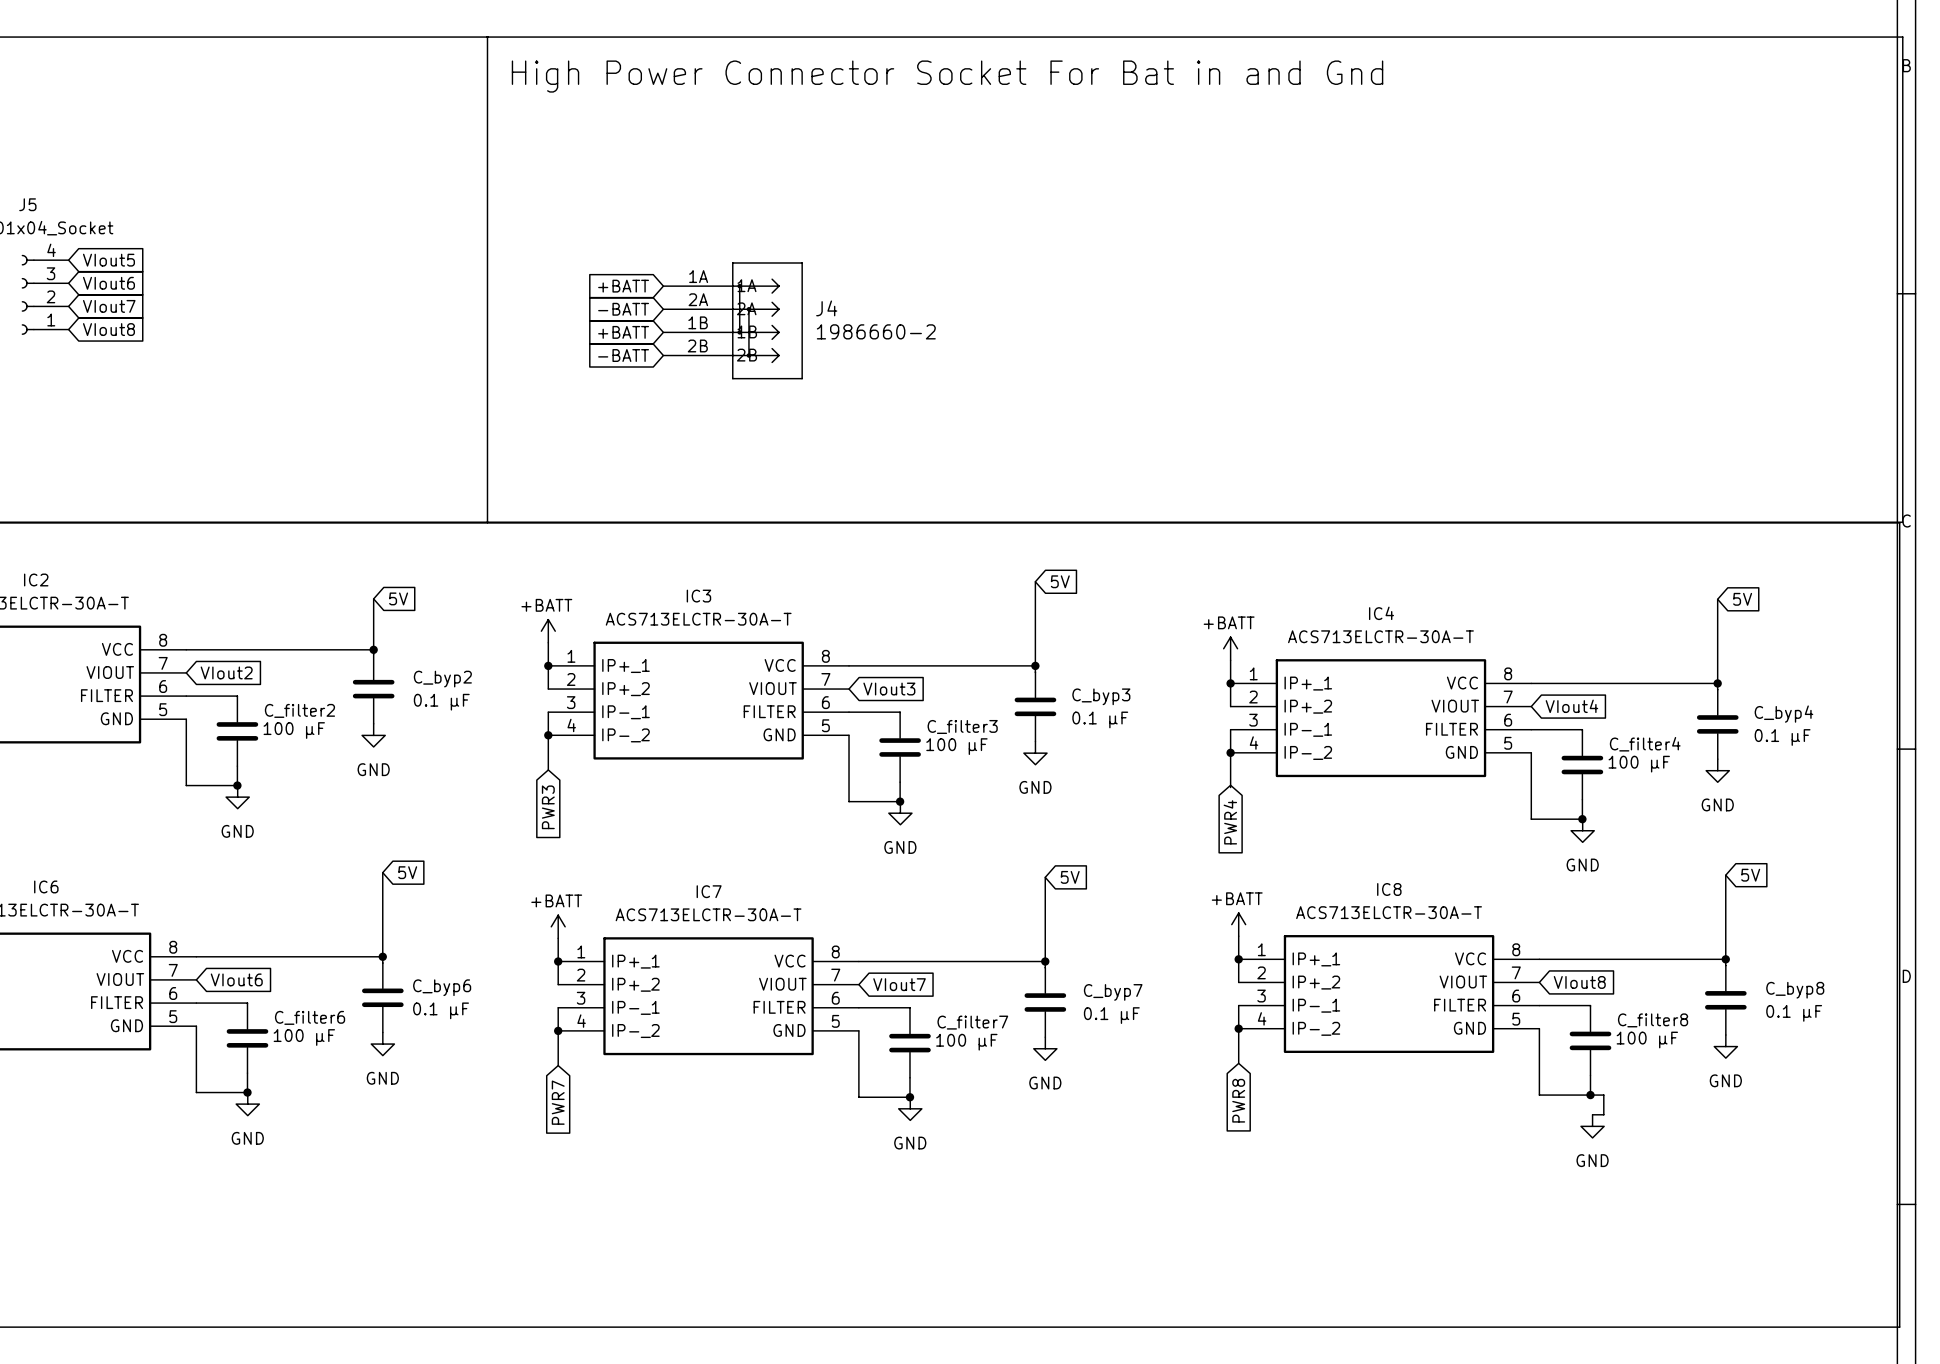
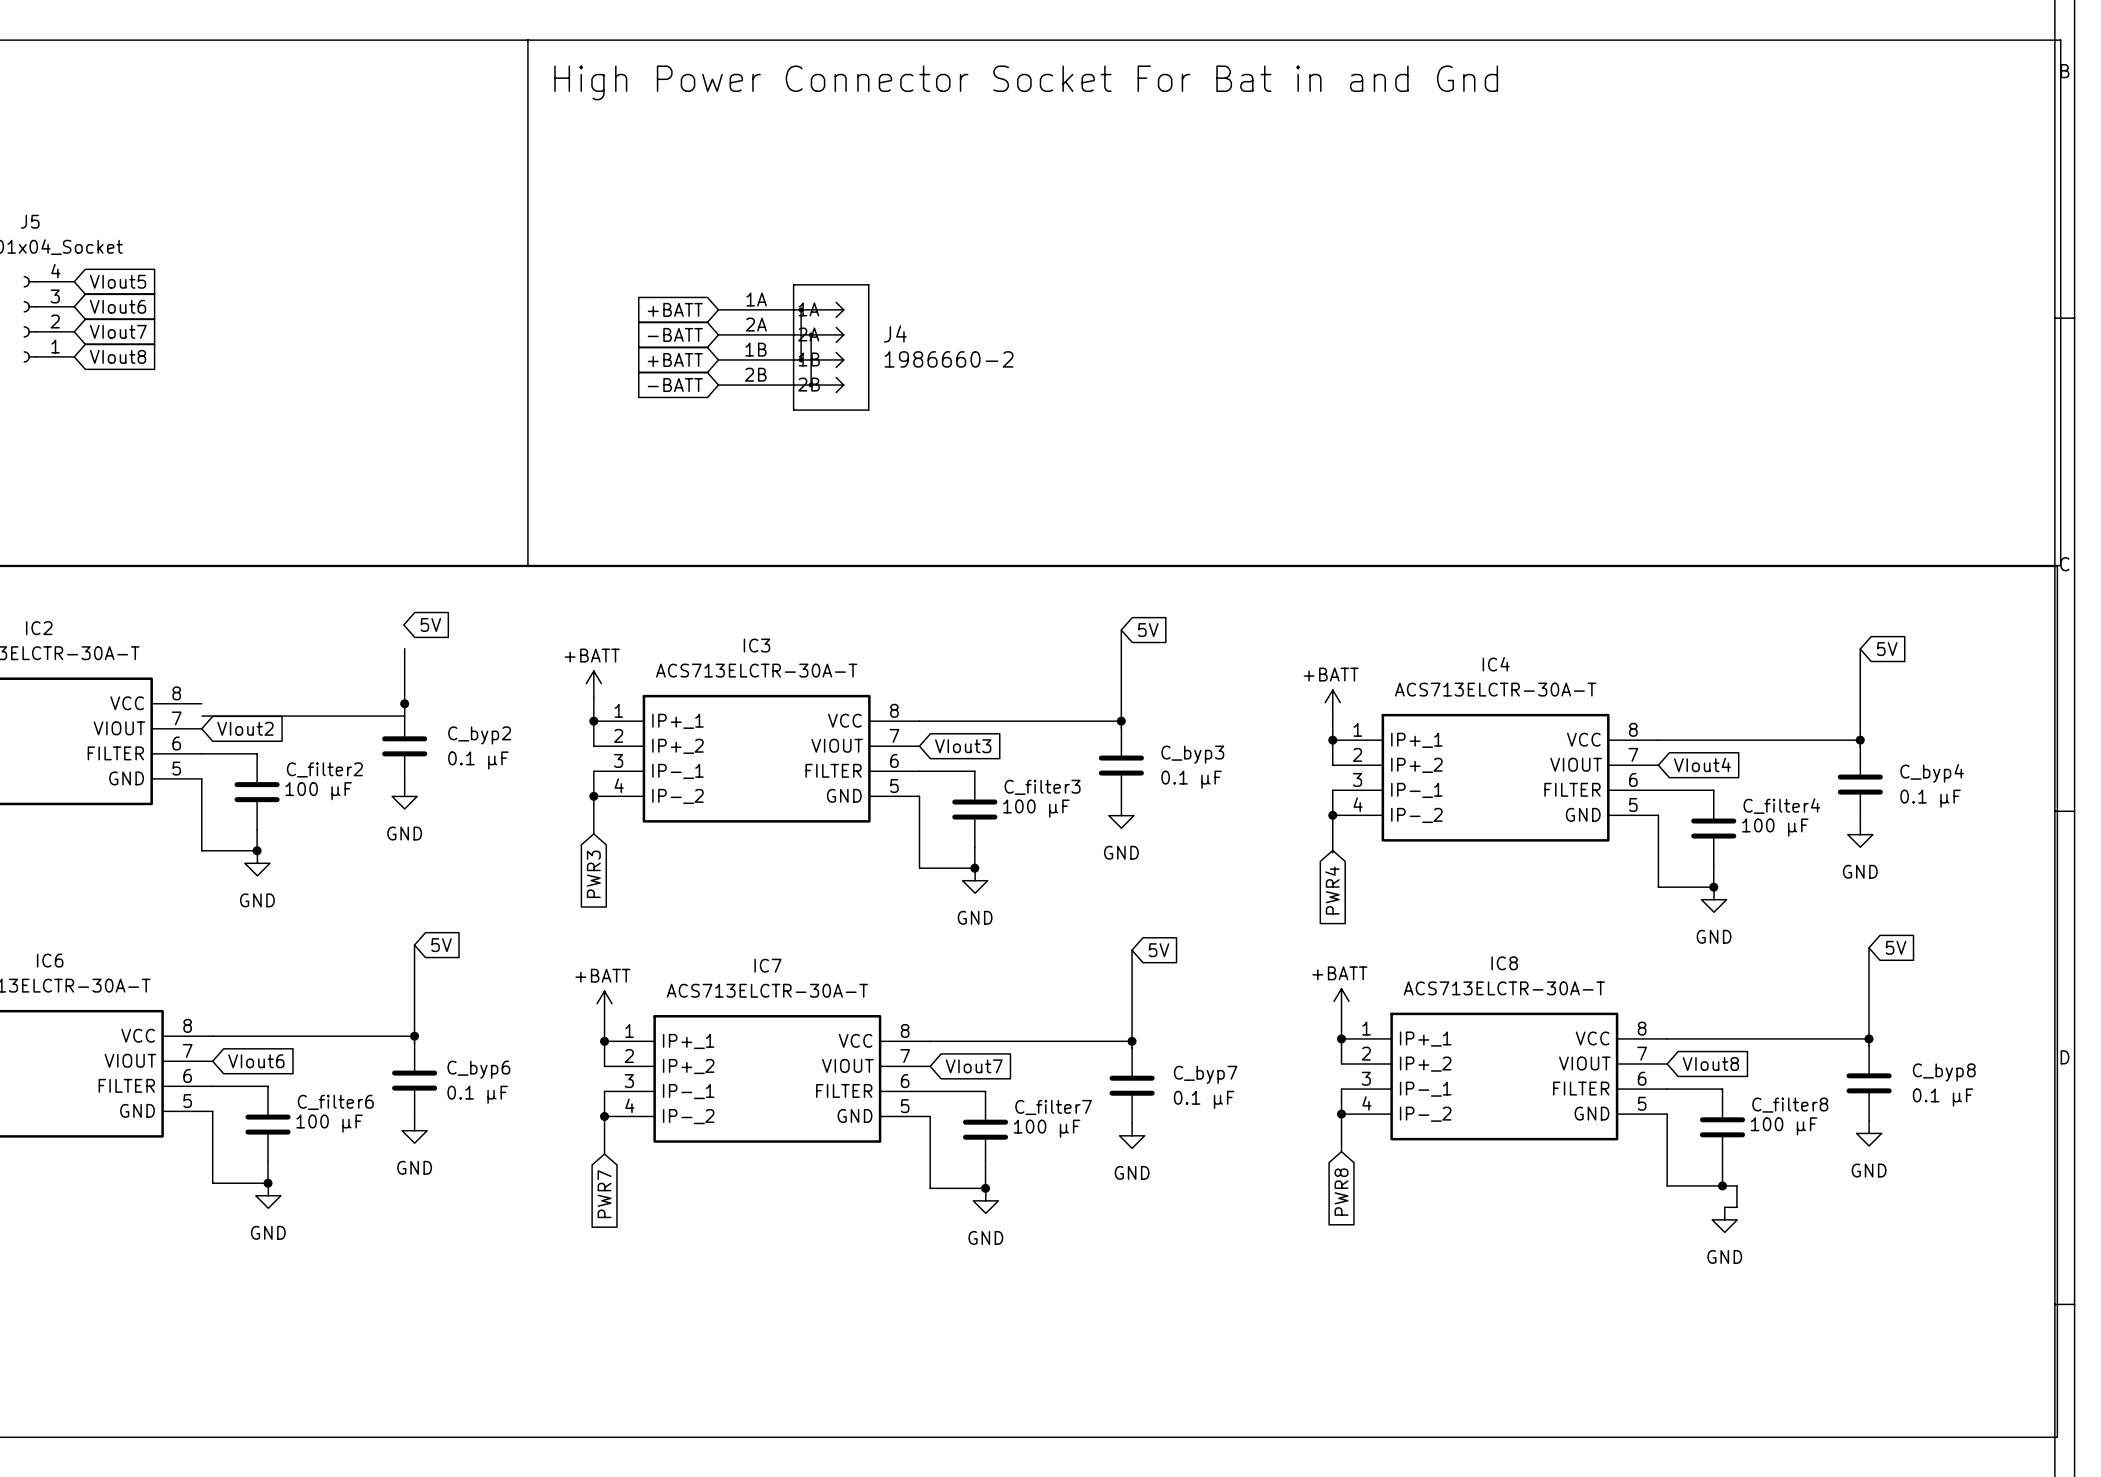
global label position: 5V (398, 598) -> 5V (430, 624)
wire: (186, 649) (373, 649) -> none
wire: none -> (201, 716) (403, 716)

